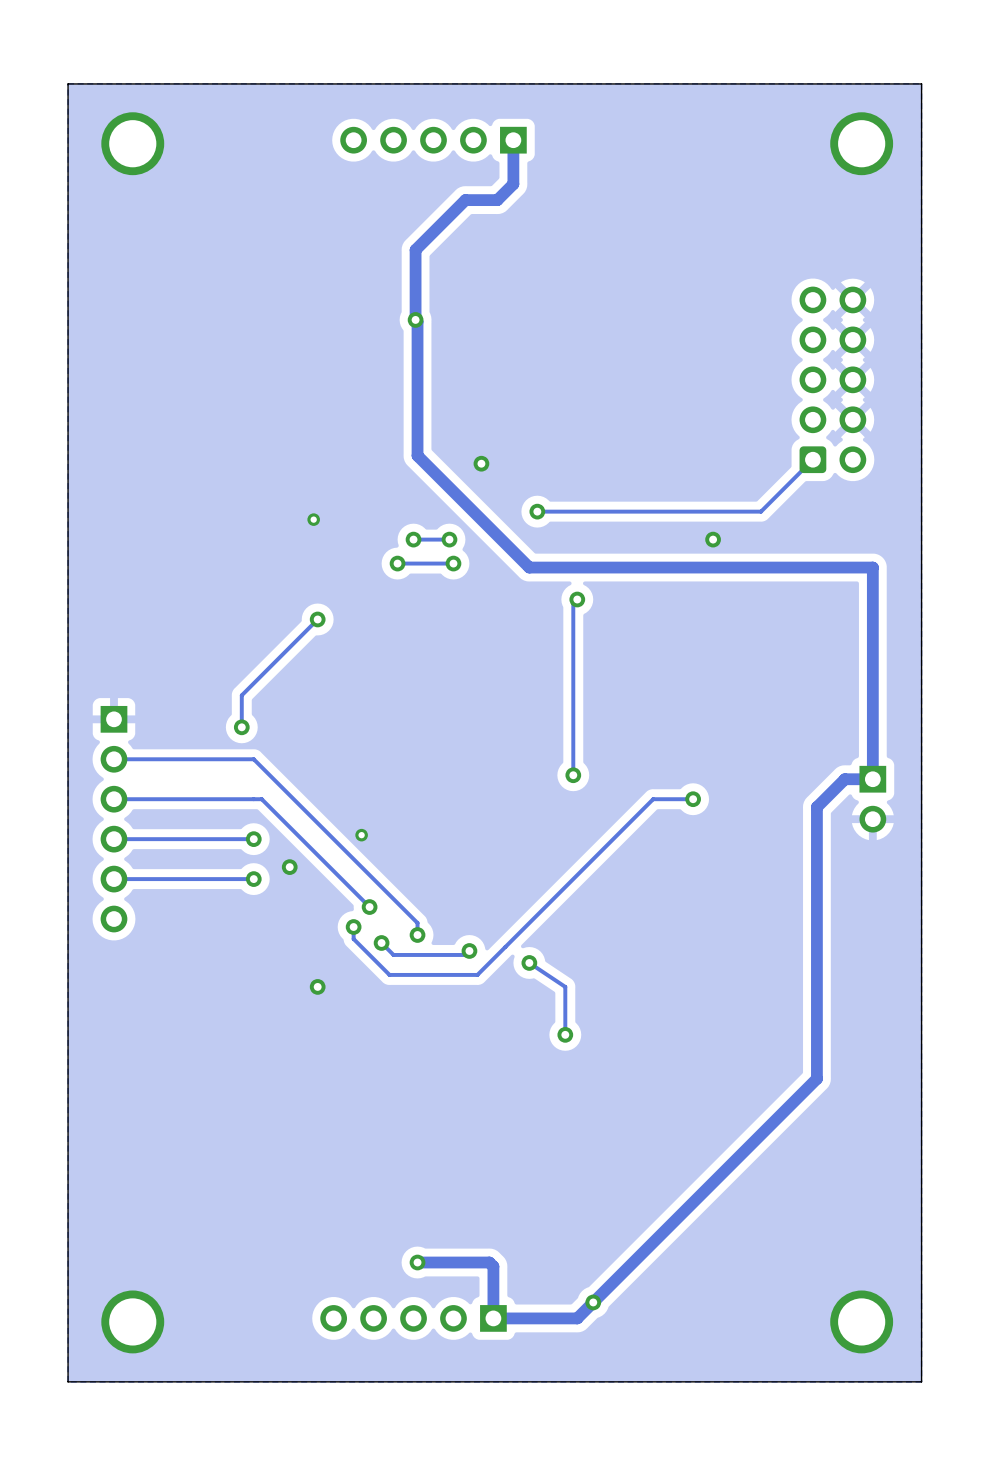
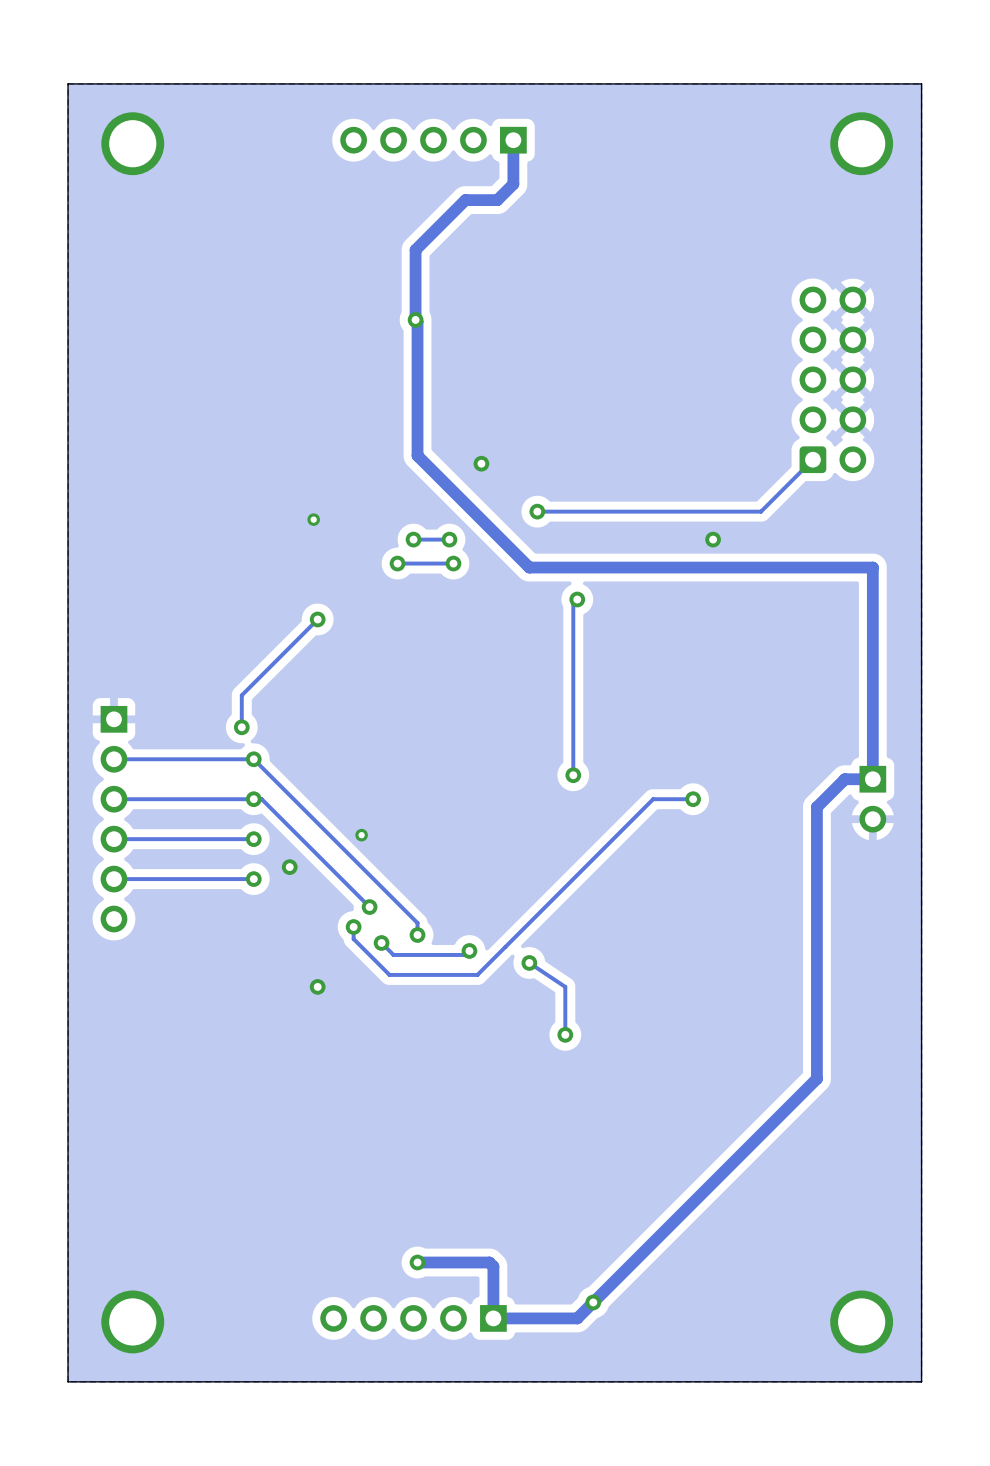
via: none -> (253, 759)
via: none -> (253, 799)

